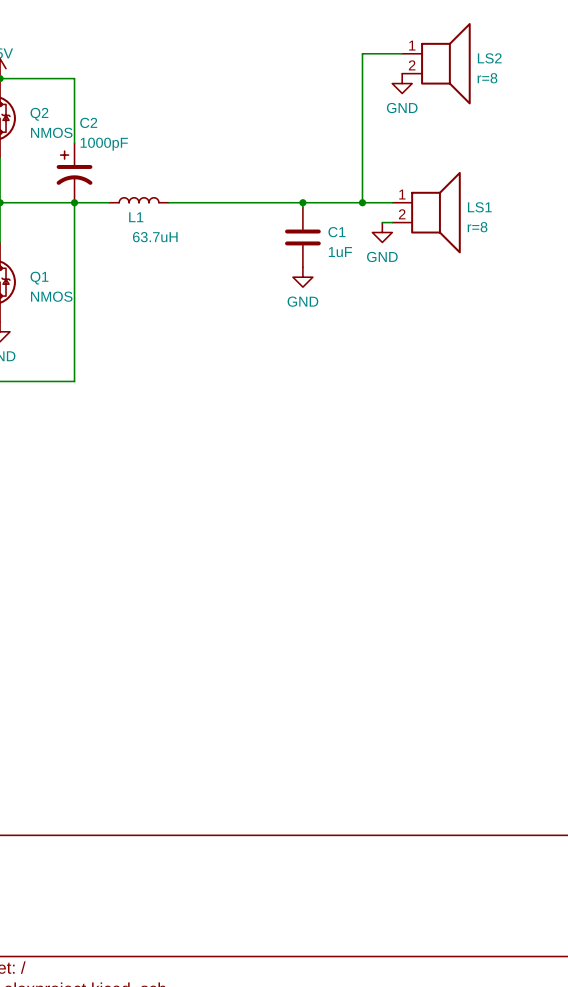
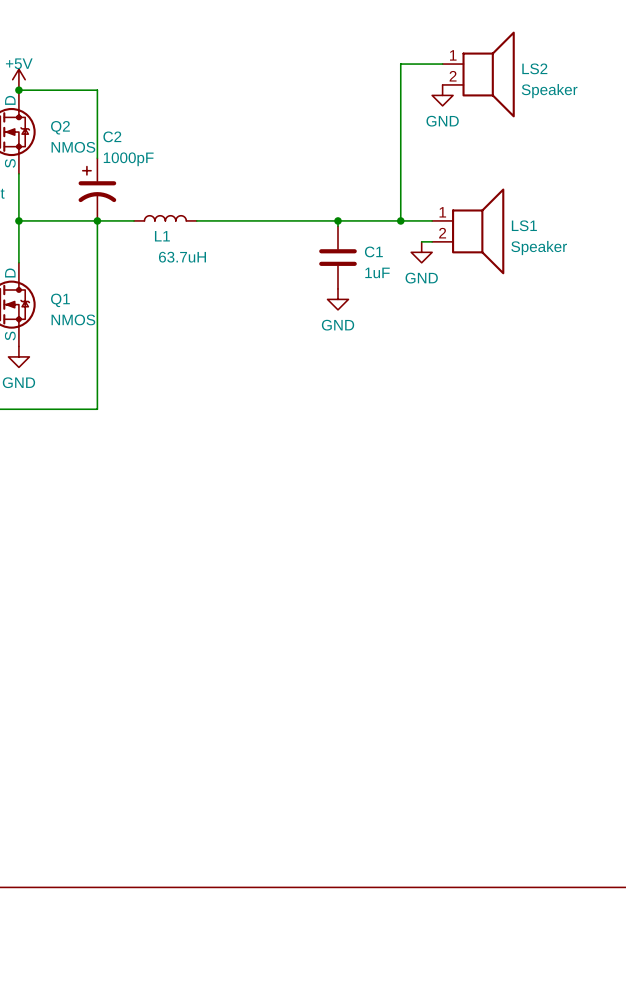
LS2 value: r=8 (487, 78) -> Speaker (549, 91)
LS1 value: r=8 (477, 227) -> Speaker (539, 248)

